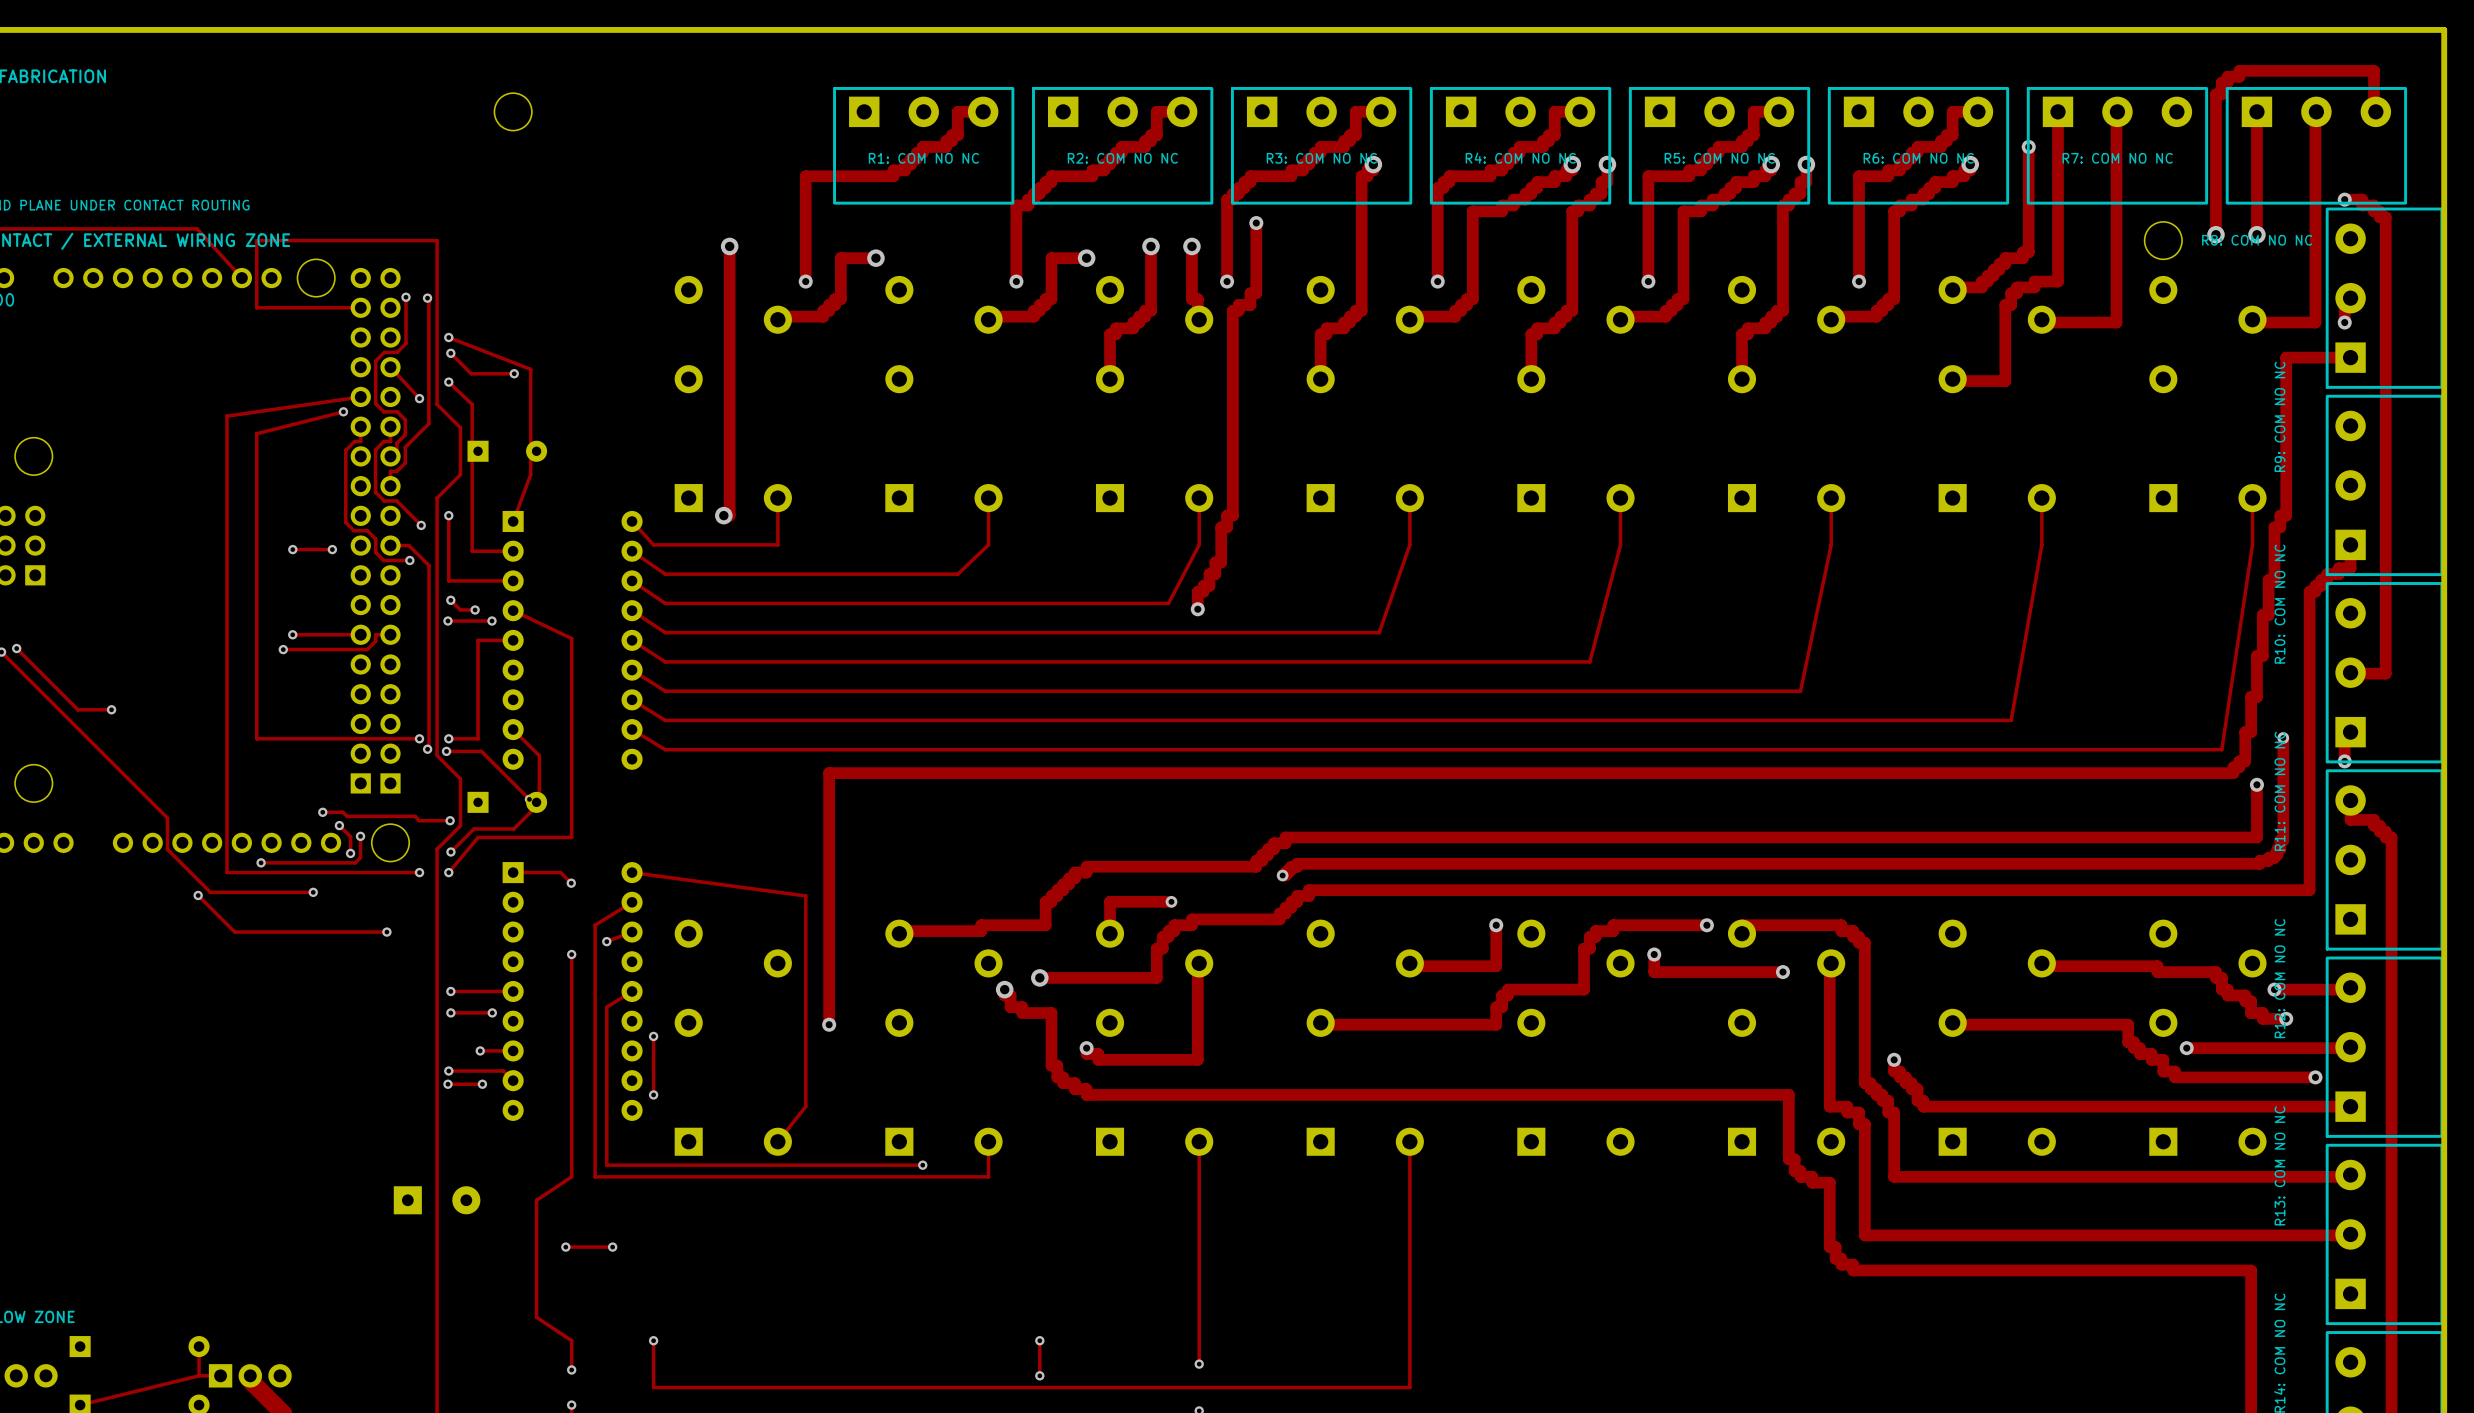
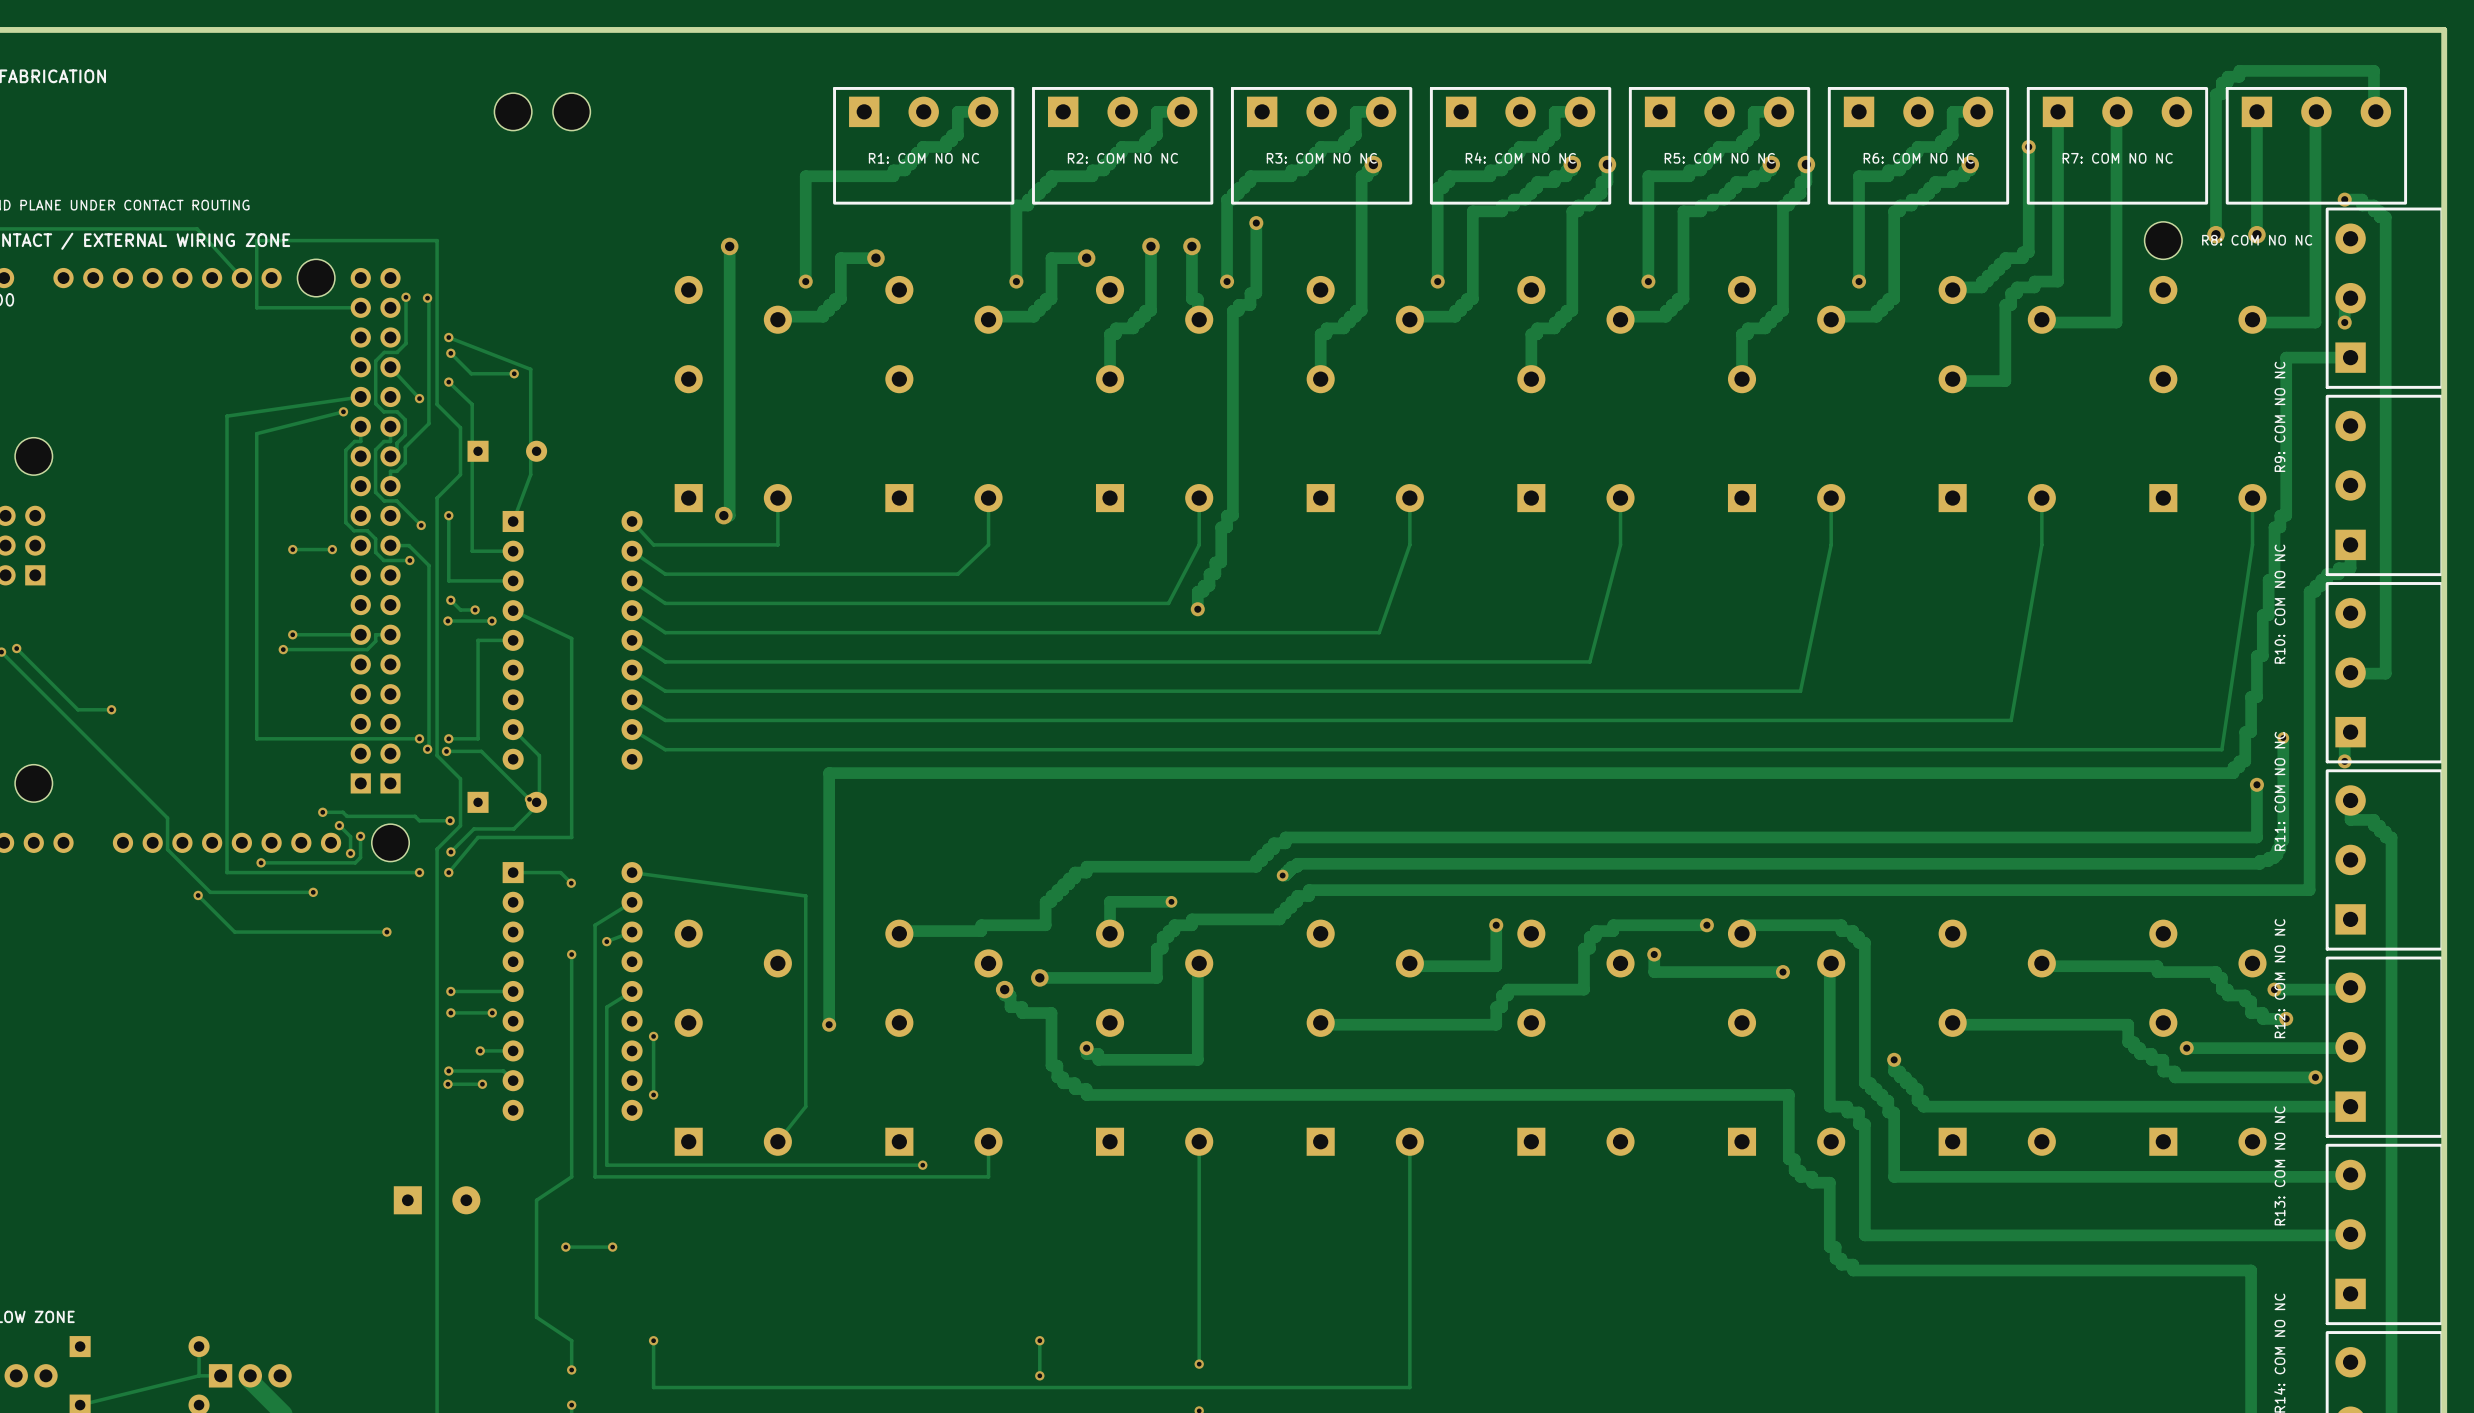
part: none -> (571, 111)

